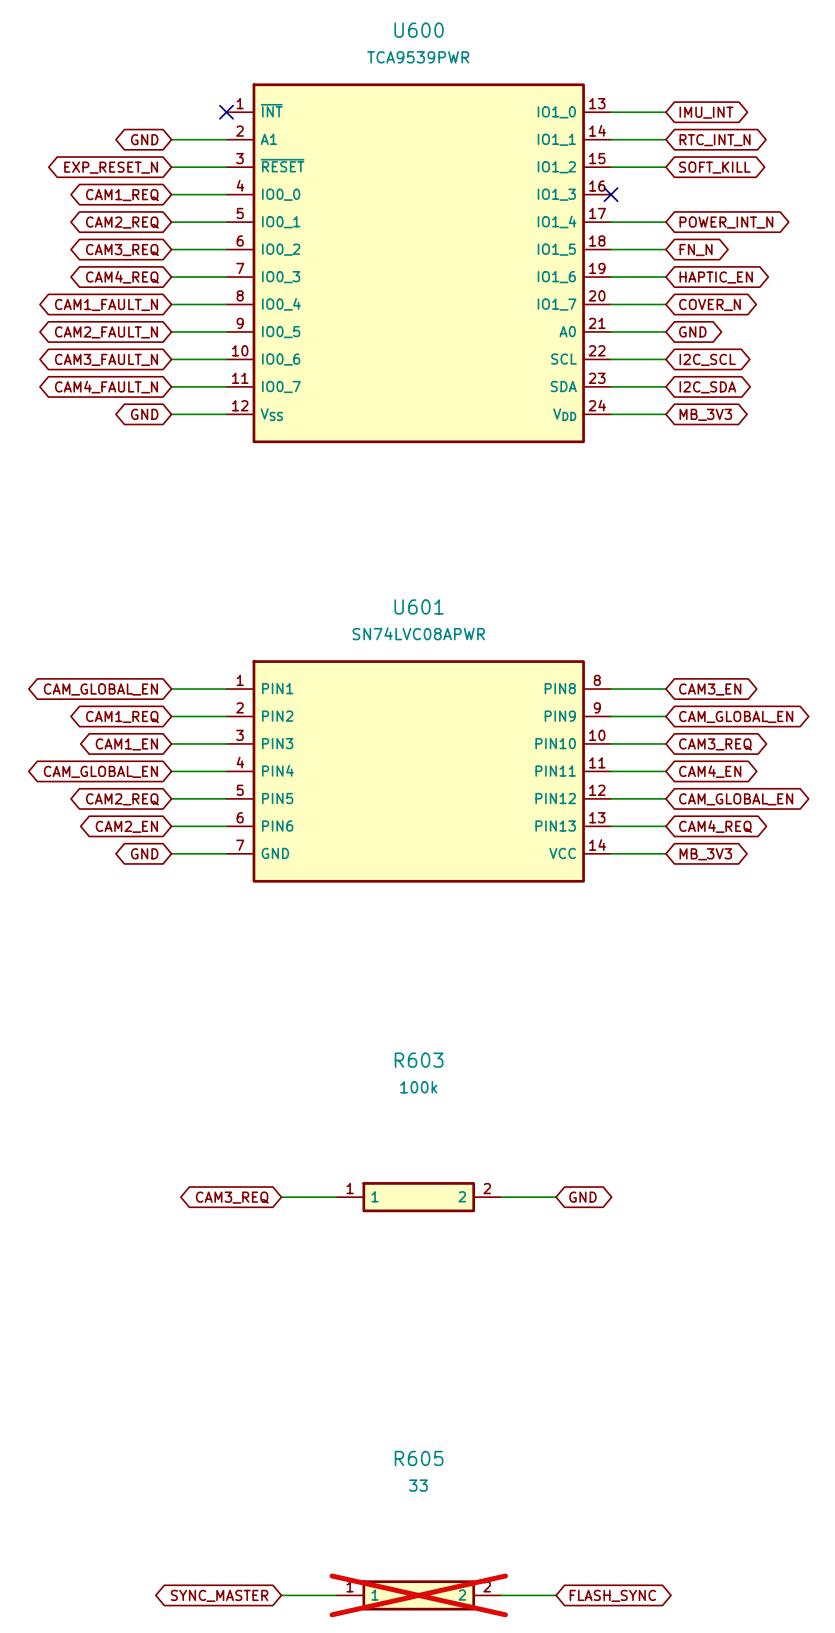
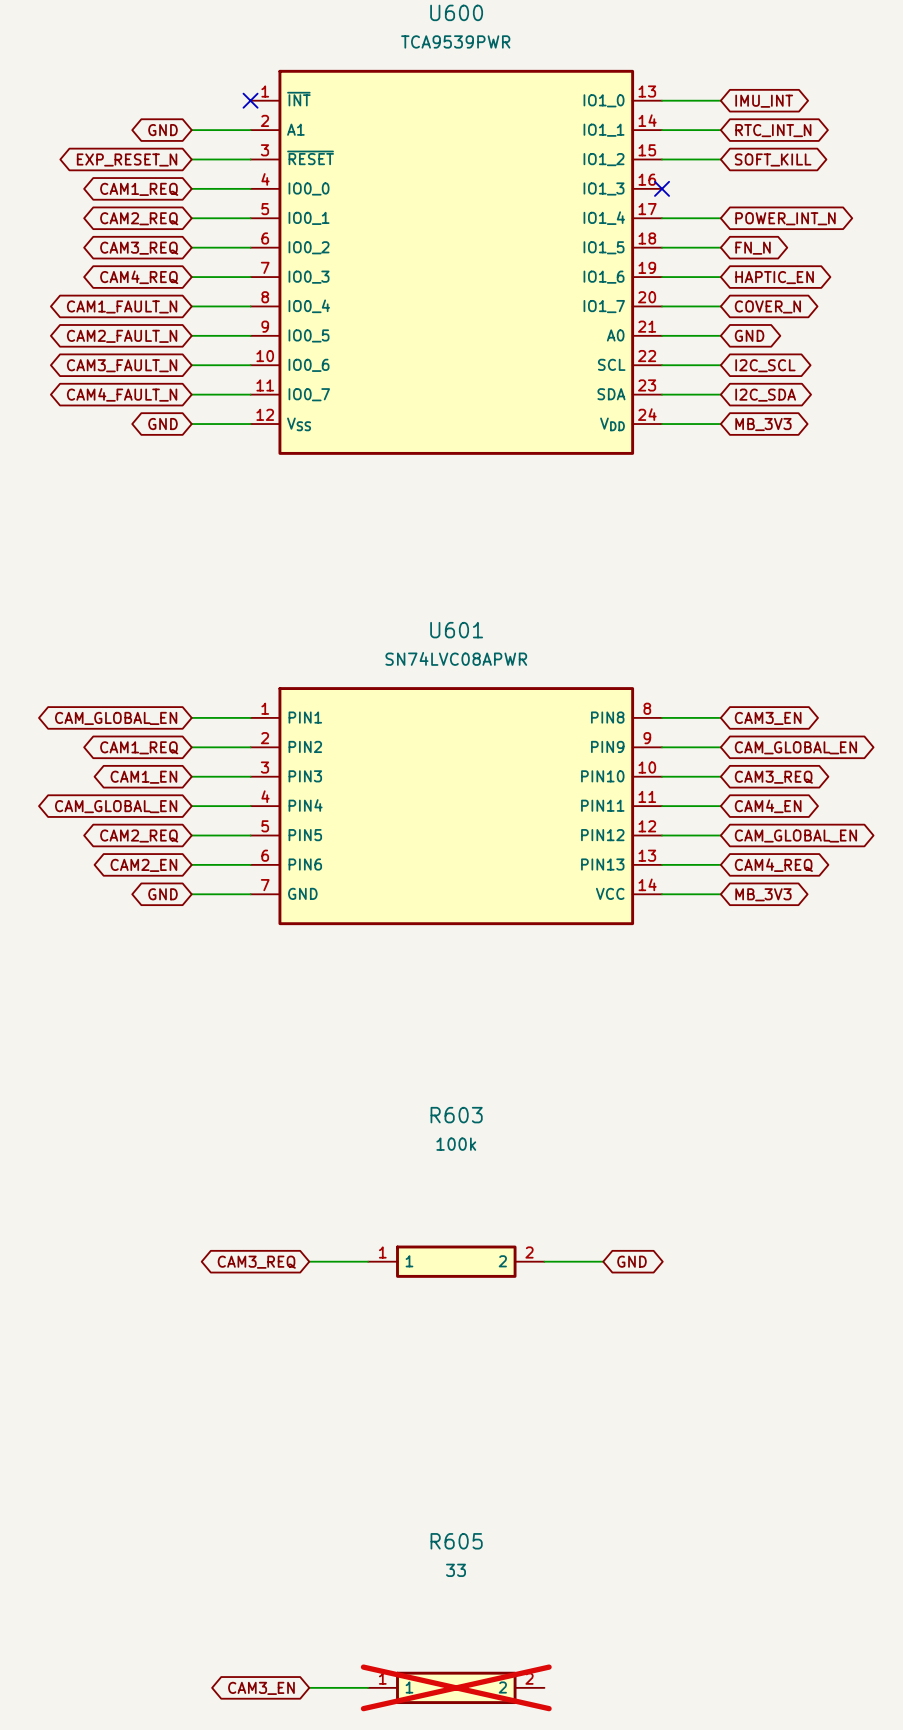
global label: SYNC_MASTER (219, 1595) -> CAM3_EN (261, 1688)
wire: (501, 1595) (556, 1595) -> none
global label: FLASH_SYNC (612, 1595) -> none

